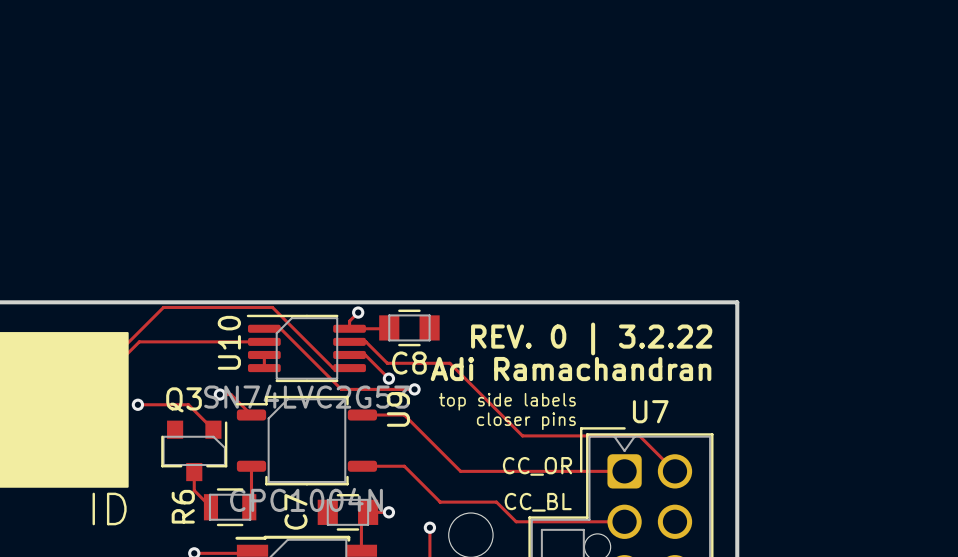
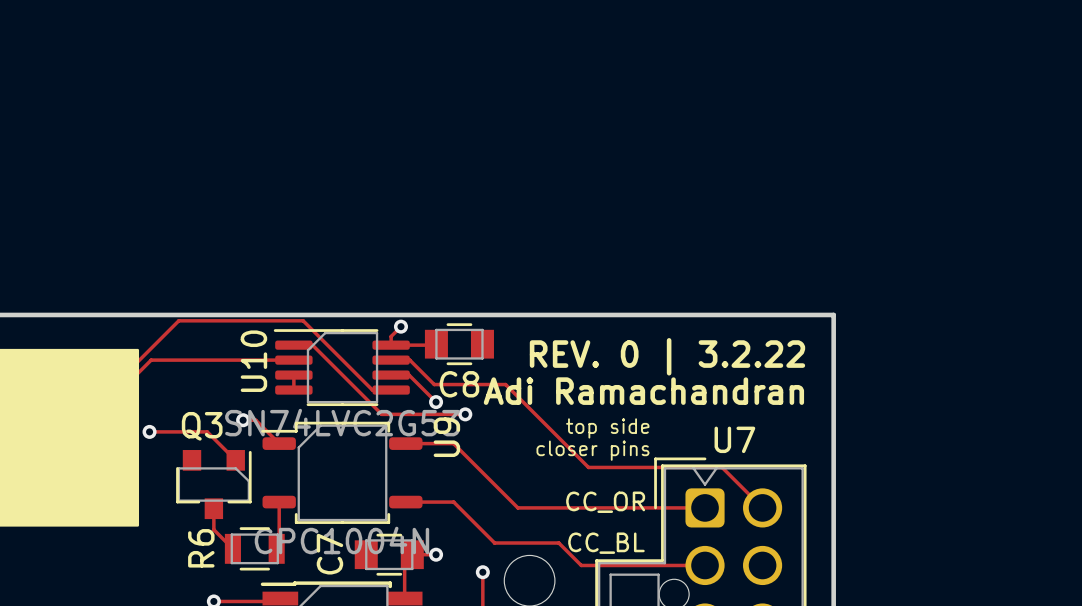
text: top side labels (507, 401) -> top side (607, 428)
text: ID (109, 508) -> none

